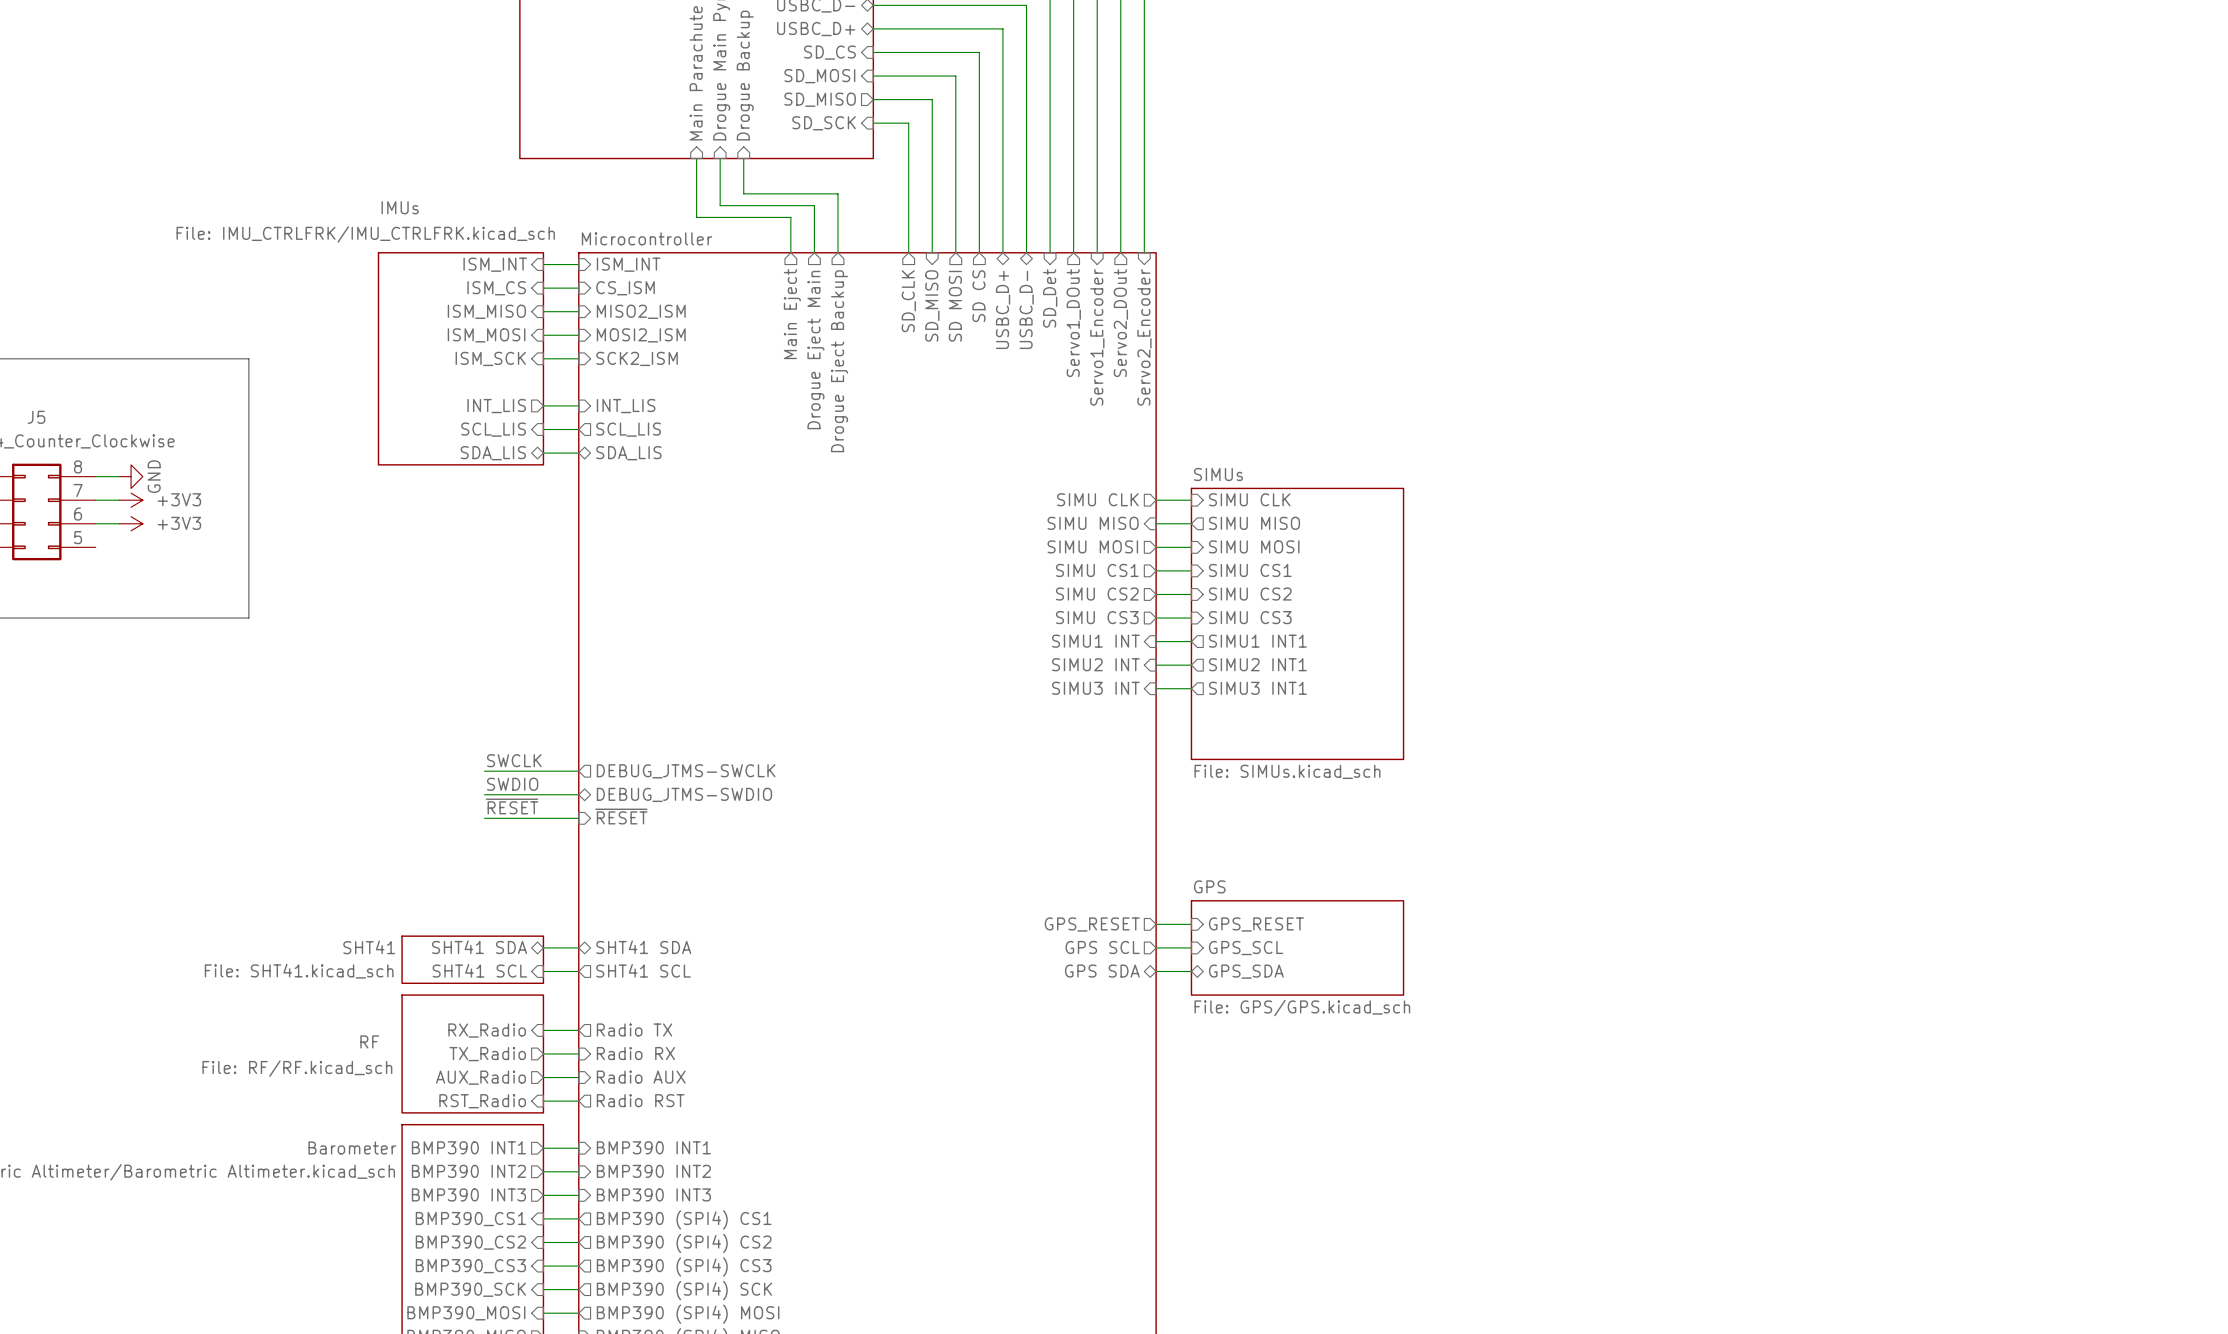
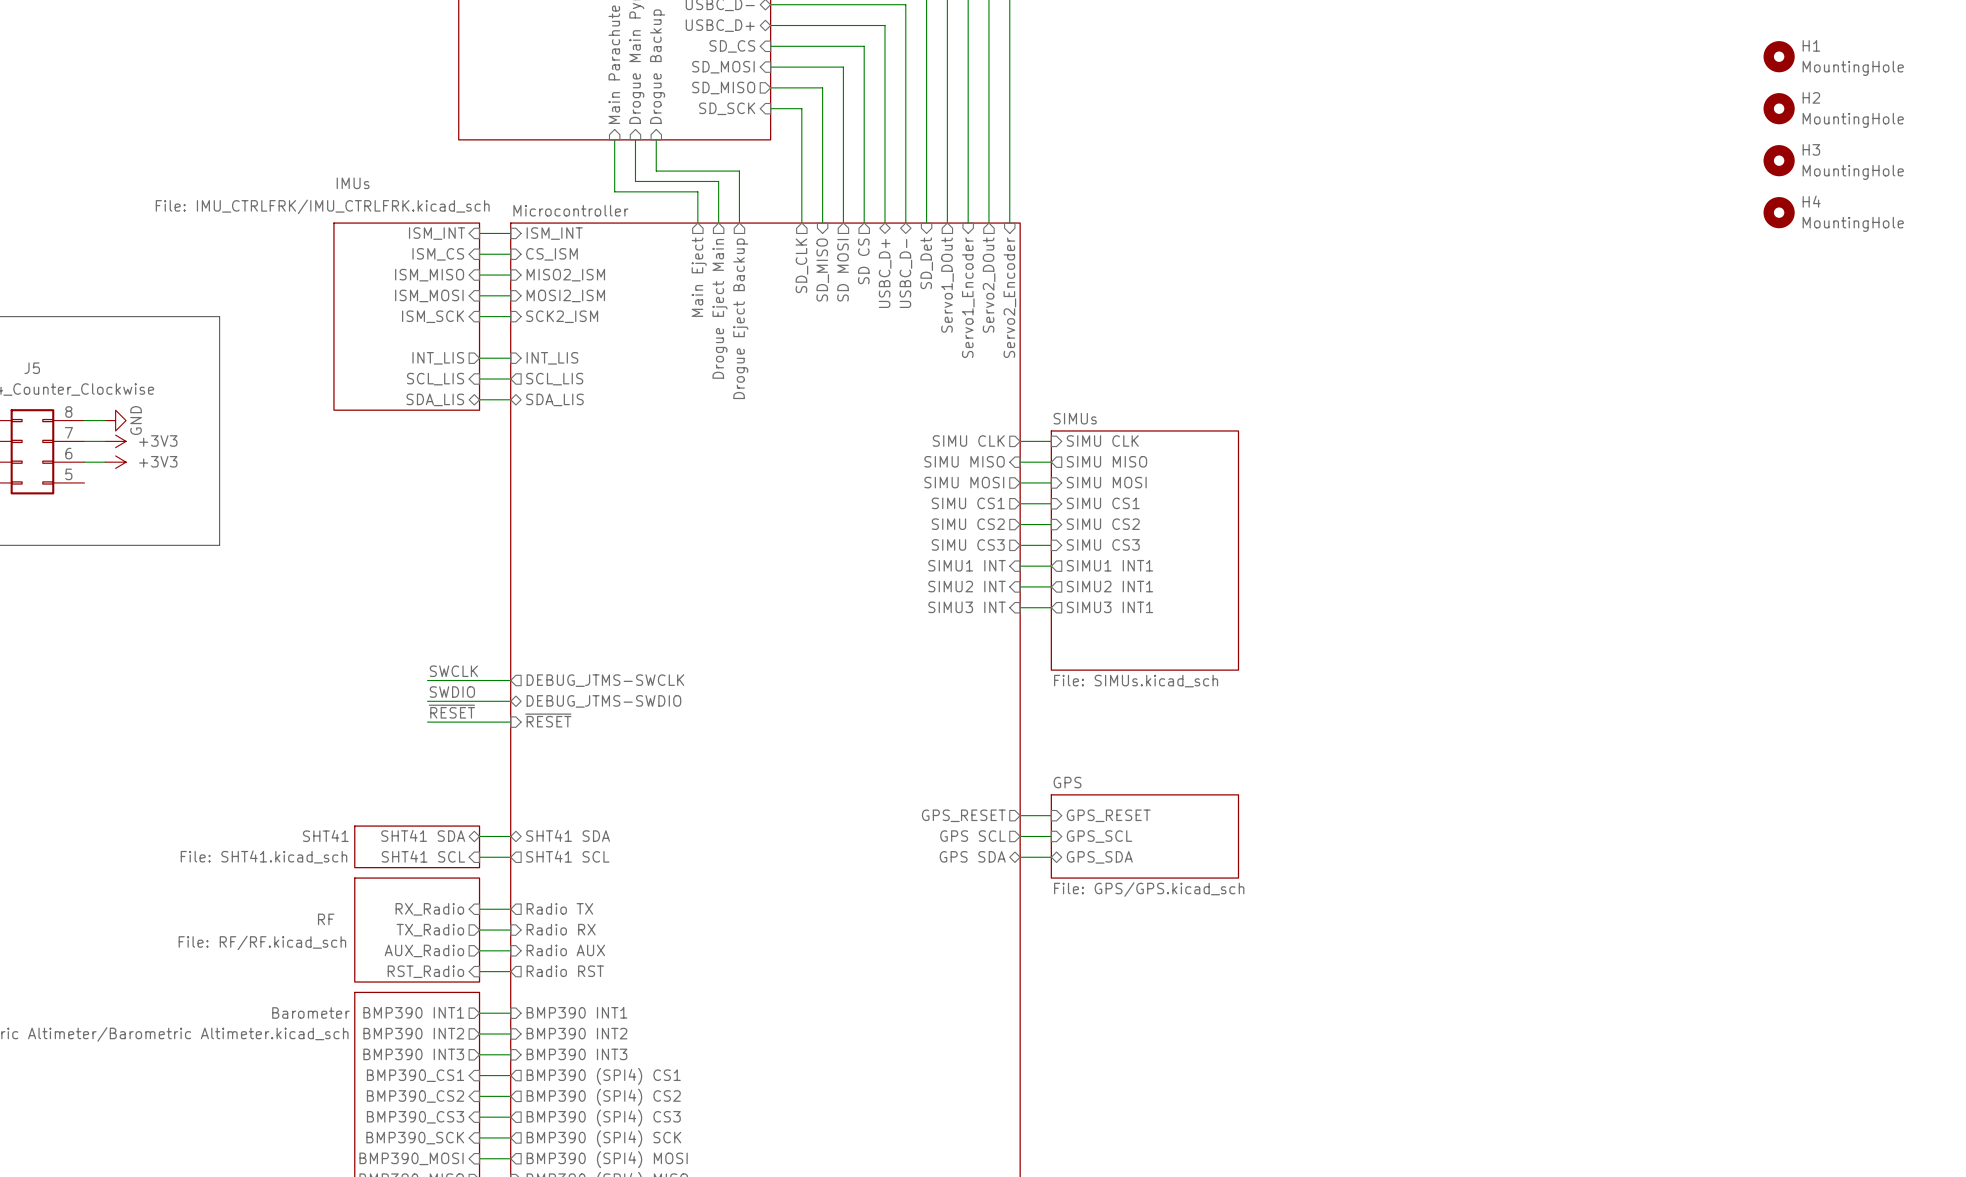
H1: none -> MountingHole (1779, 56)
H2: none -> MountingHole (1779, 108)
H3: none -> MountingHole (1779, 160)
H4: none -> MountingHole (1779, 212)

